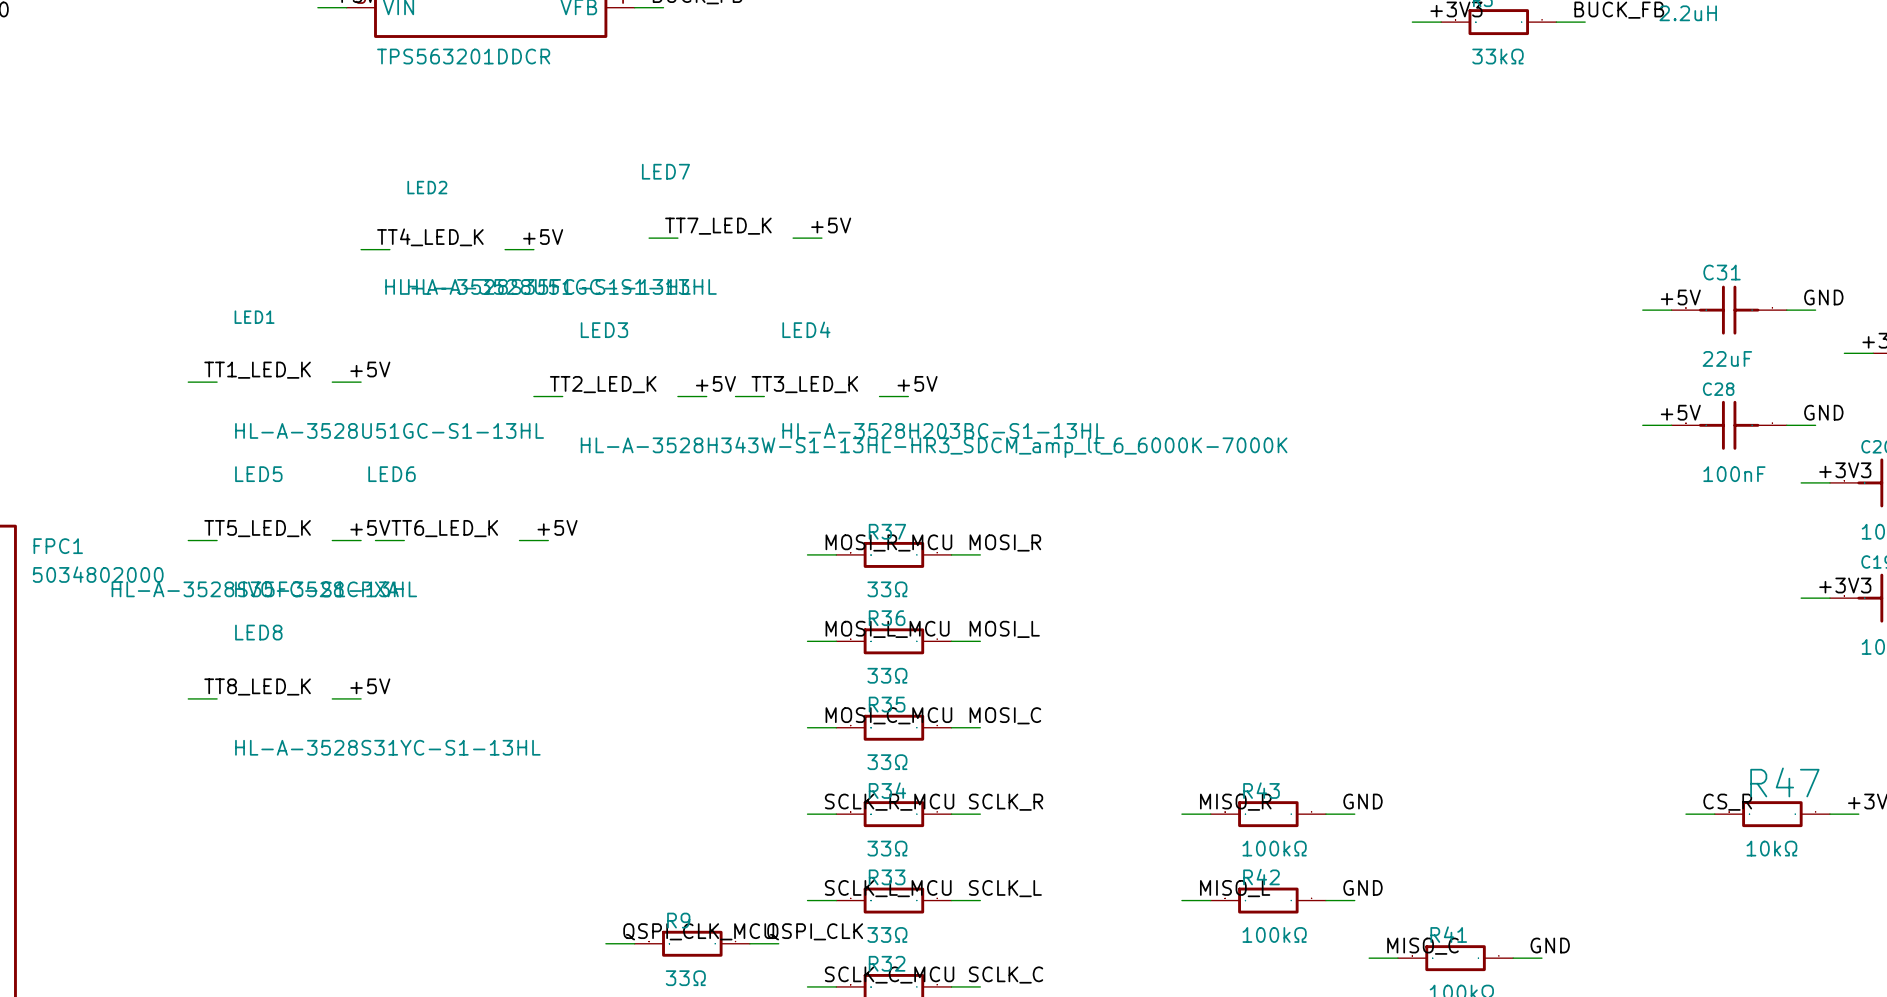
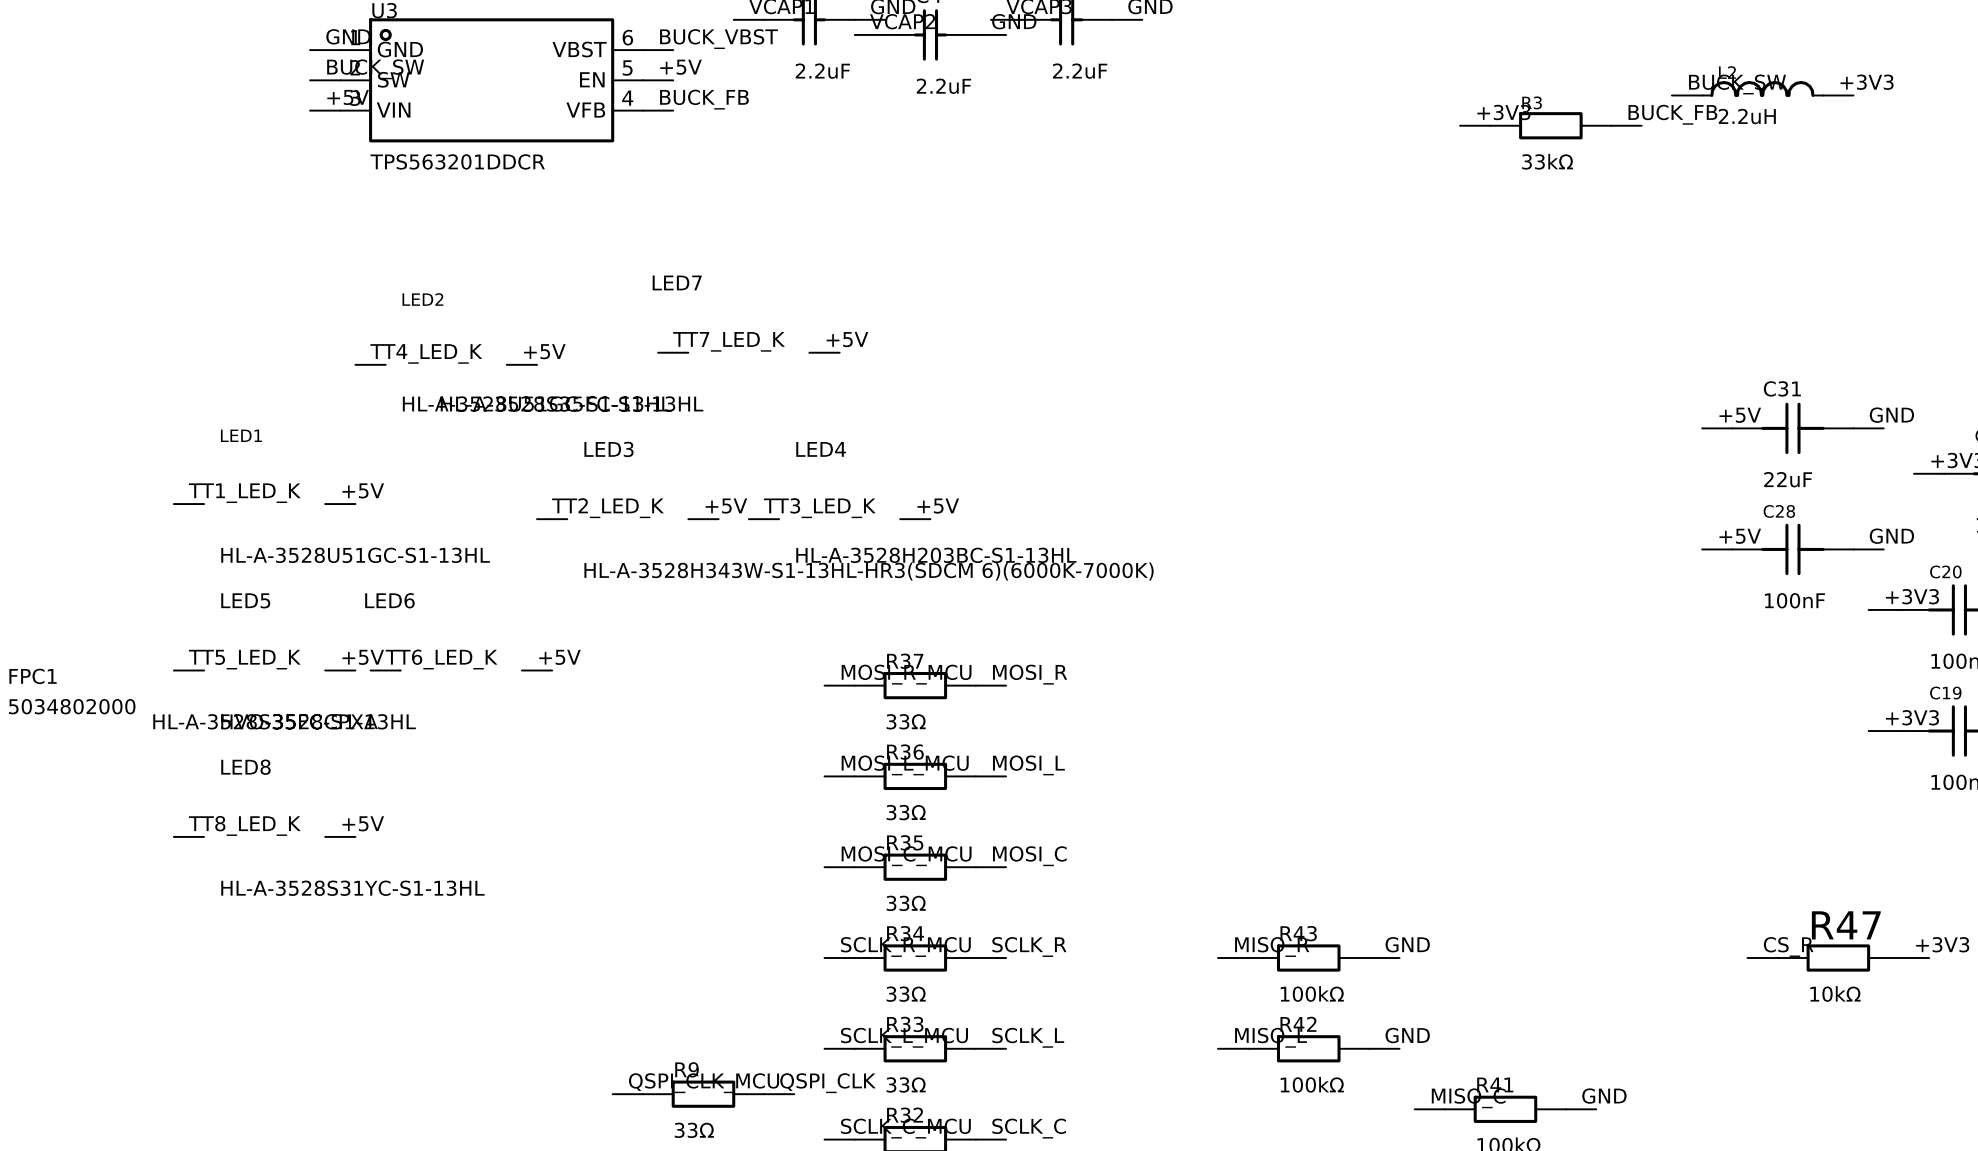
LED3 position: (934, 390) -> (869, 511)
LED3 value: HL-A-3528H343W-S1-13HL-HR3_SDCM_amp_lt_6_6000K-7000K (934, 447) -> HL-A-3528H343W-S1-13HL-HR3(SDCM 6)(6000K-7000K) (869, 571)

